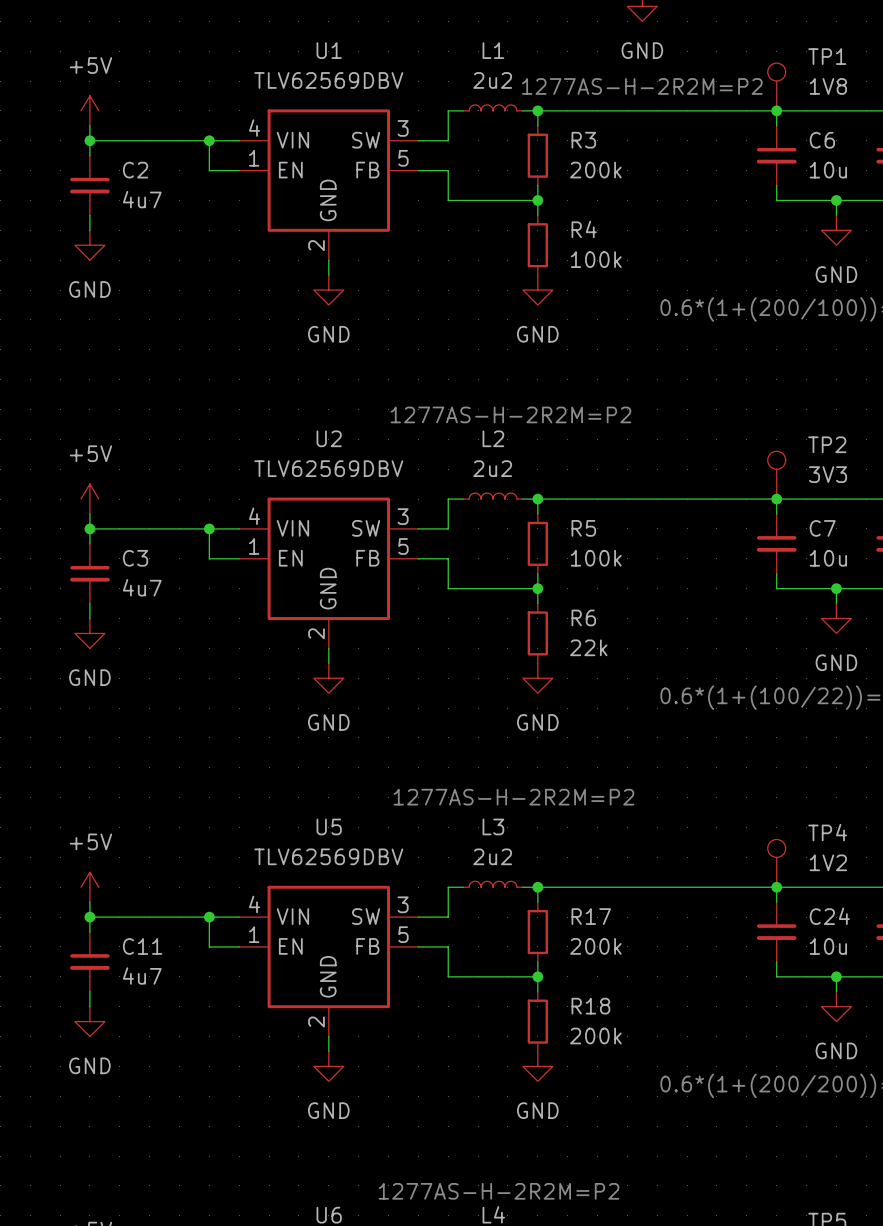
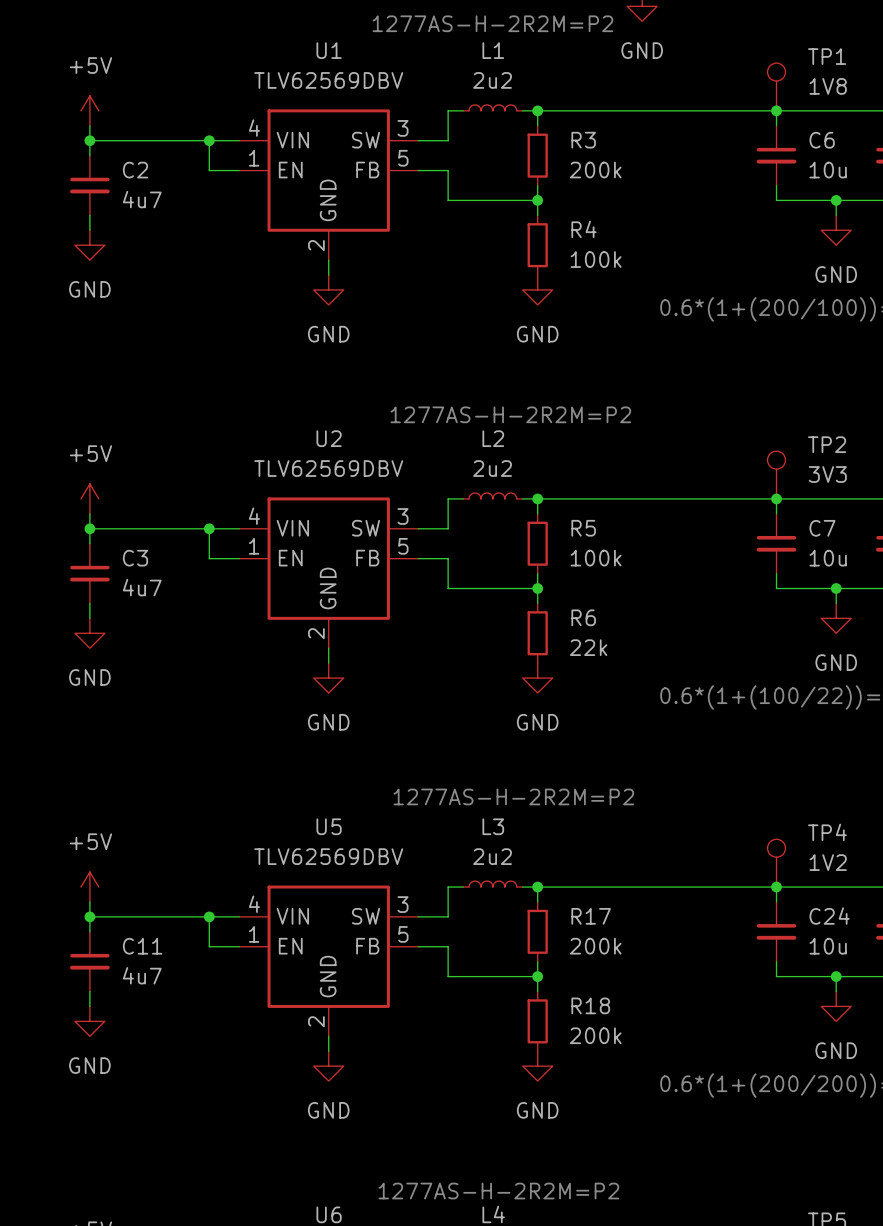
text position: 1277AS-H-2R2M=P2 (642, 86) -> 1277AS-H-2R2M=P2 (492, 23)

